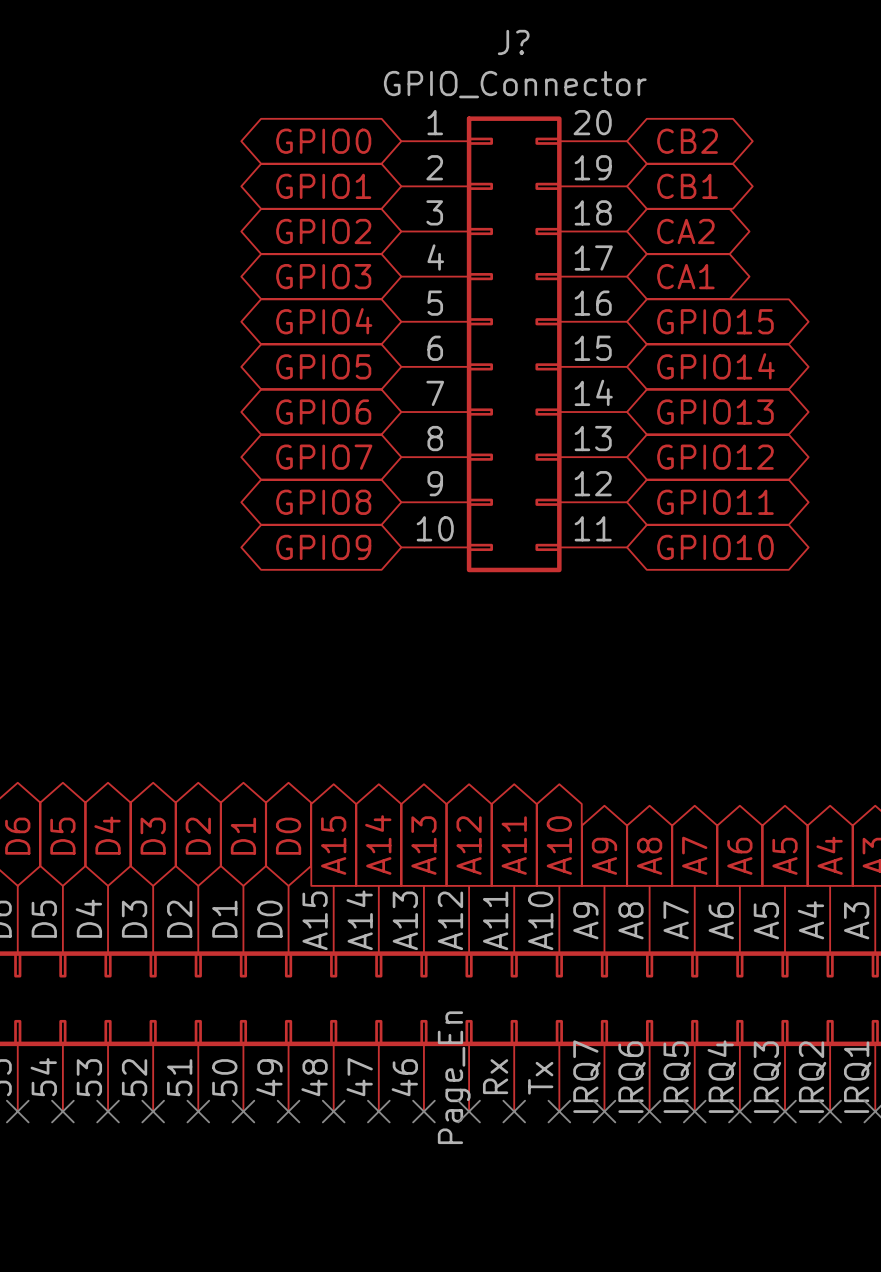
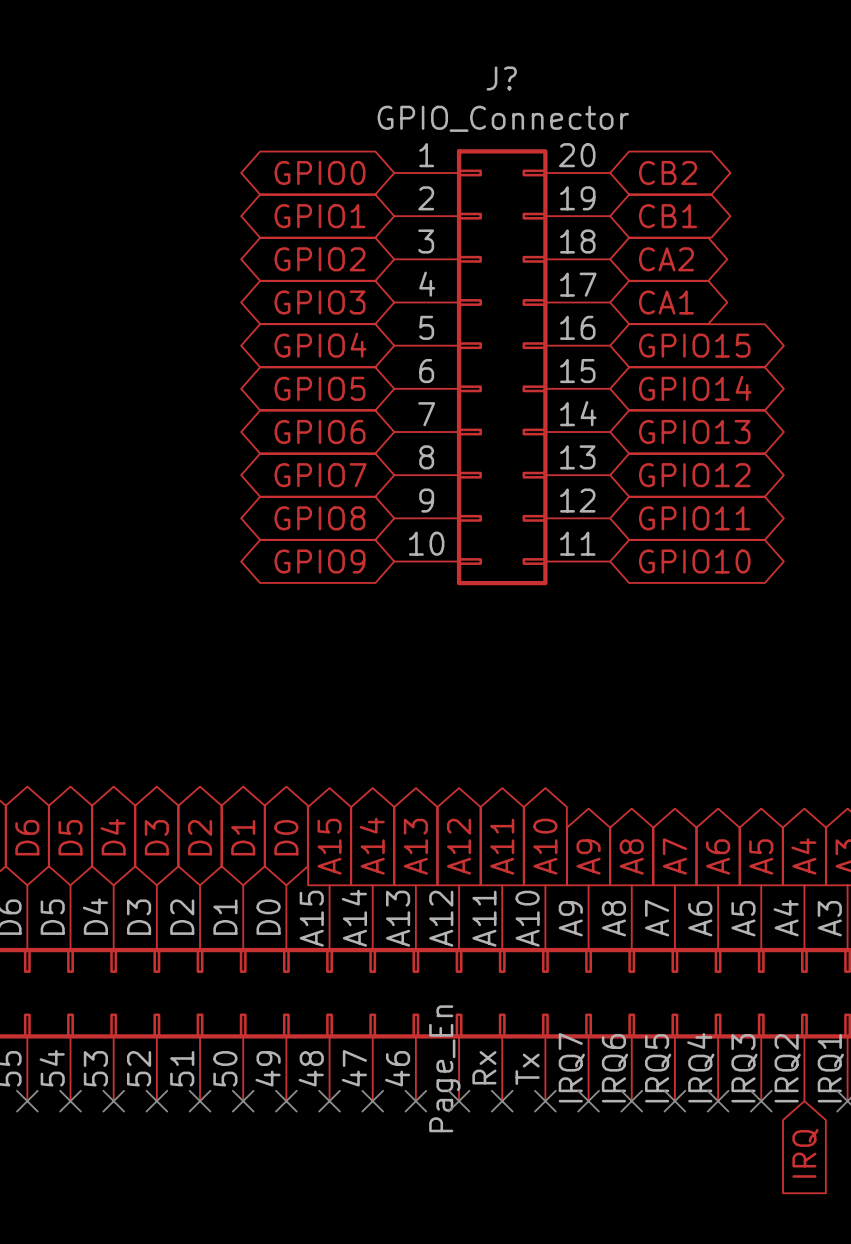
no-connect mark: (830, 1111) -> none
global label: none -> IRQ (805, 1153)

